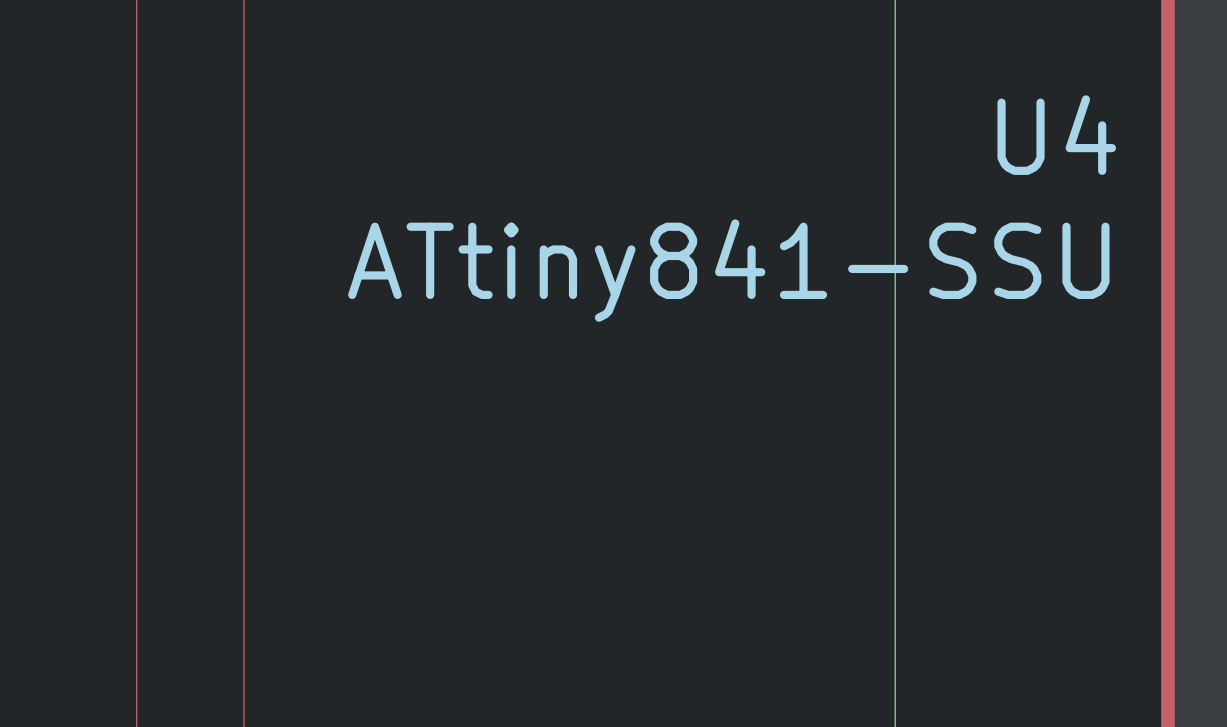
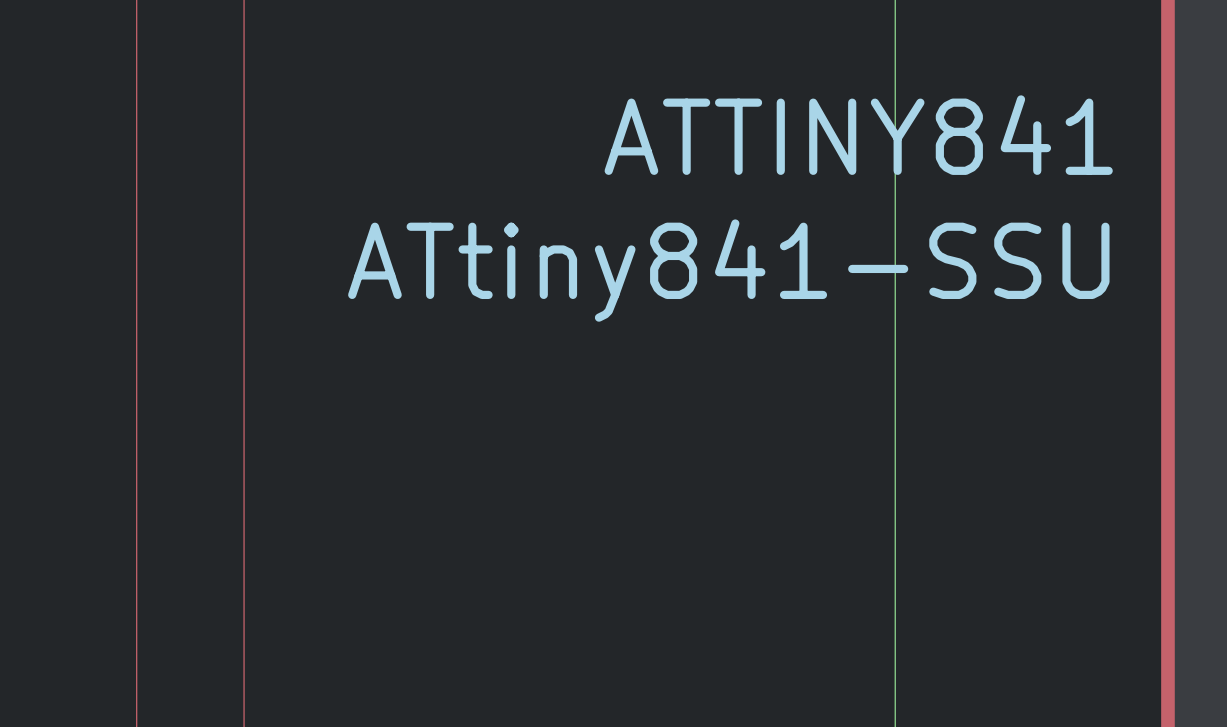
U4 name: U4 (1056, 135) -> ATTINY841 (858, 135)

